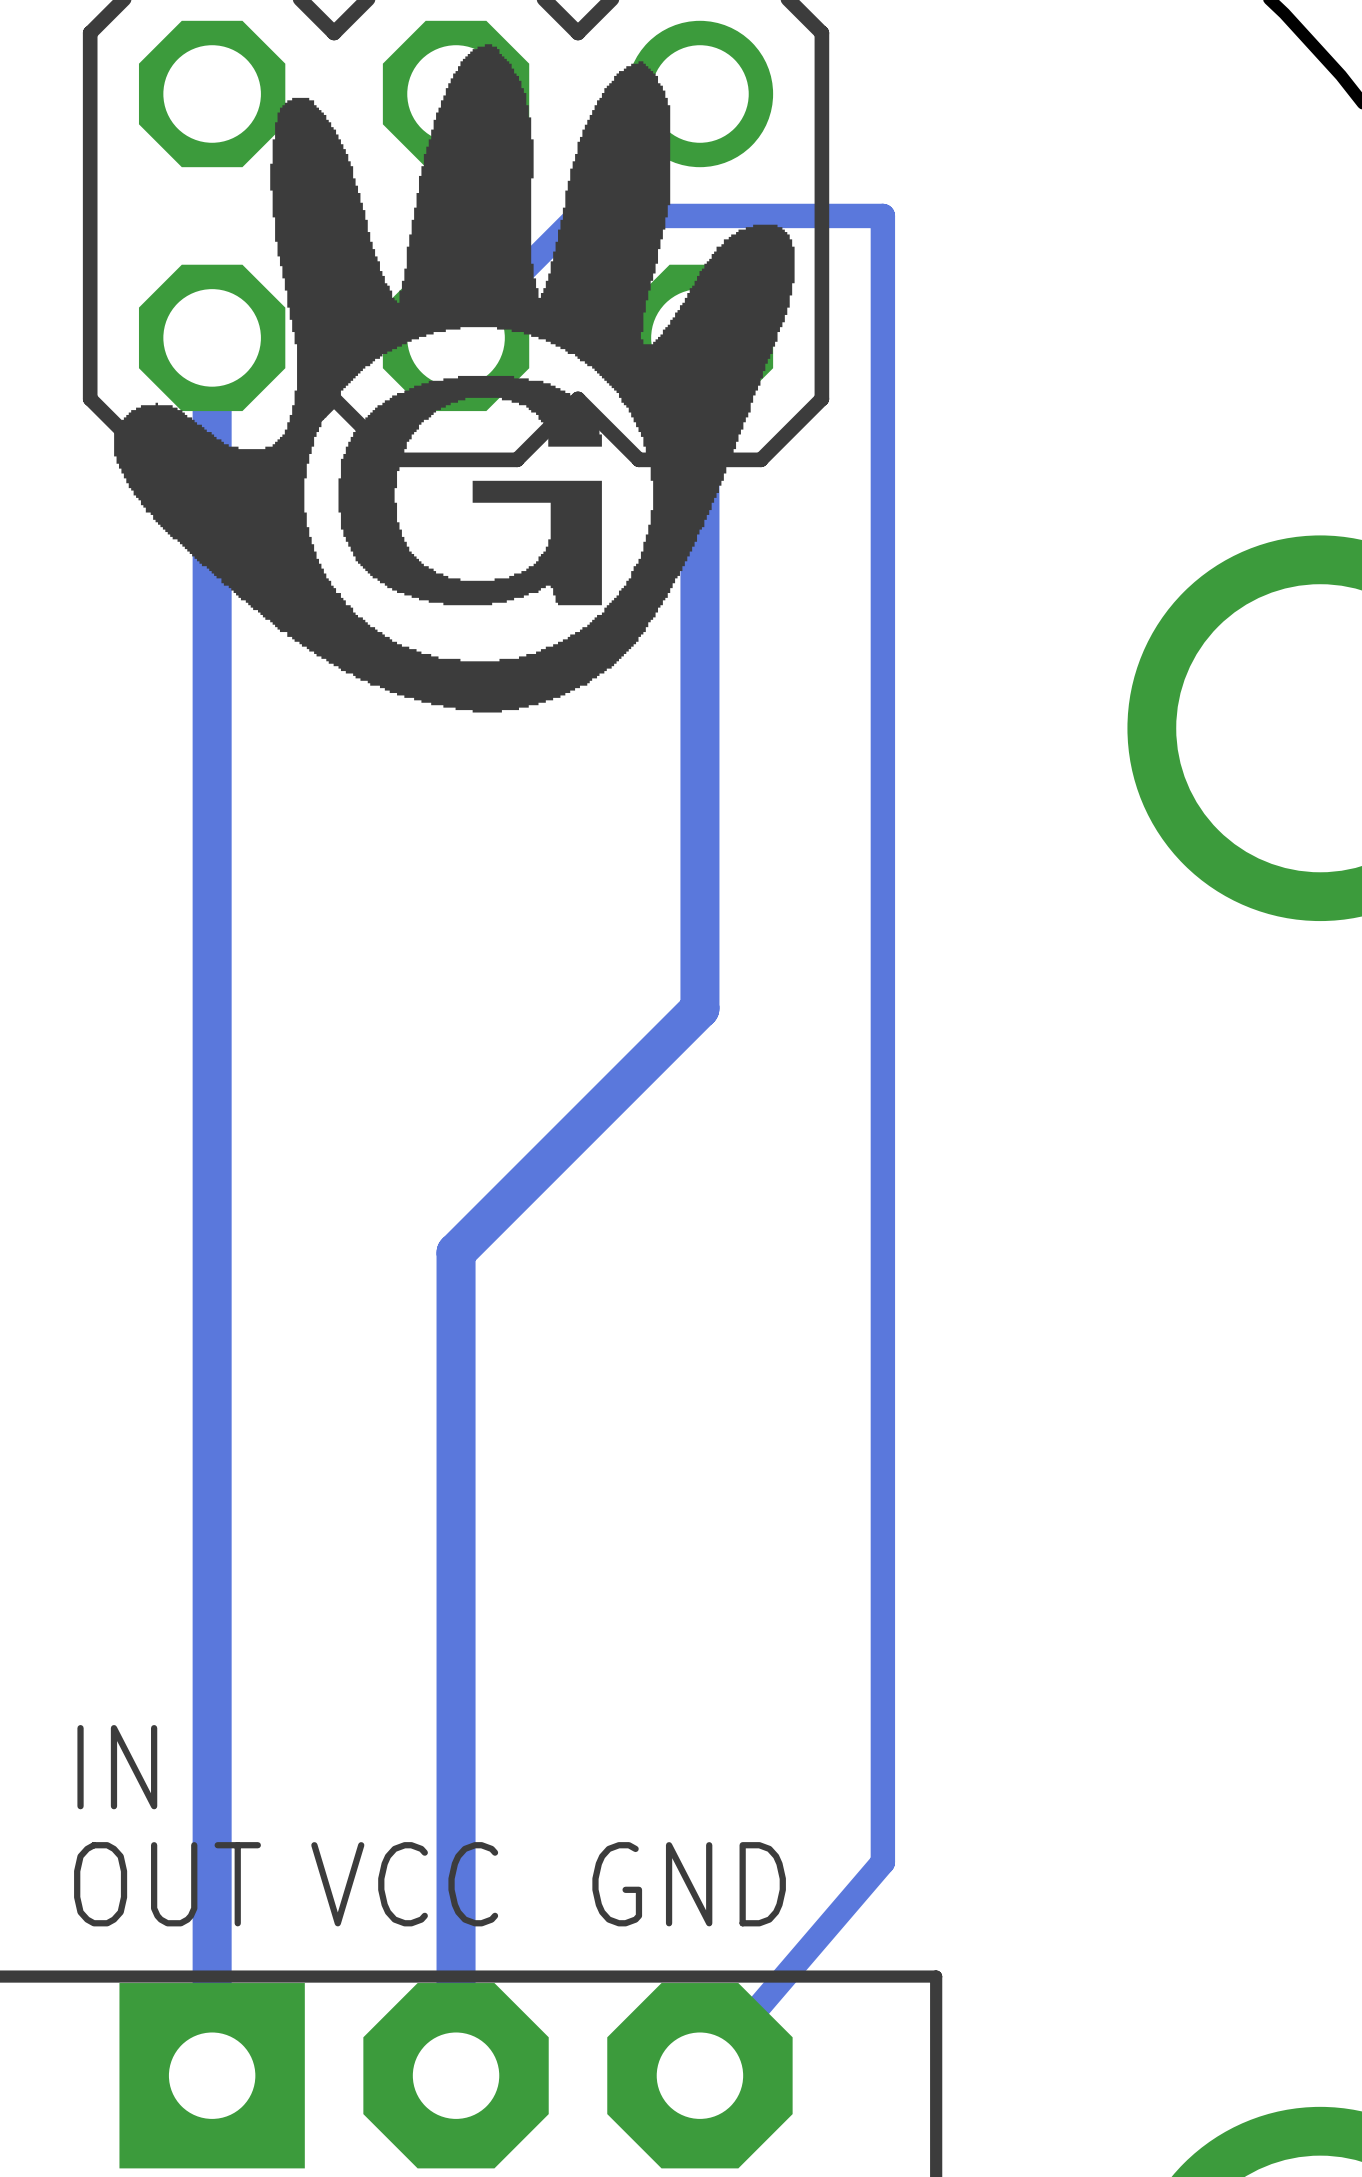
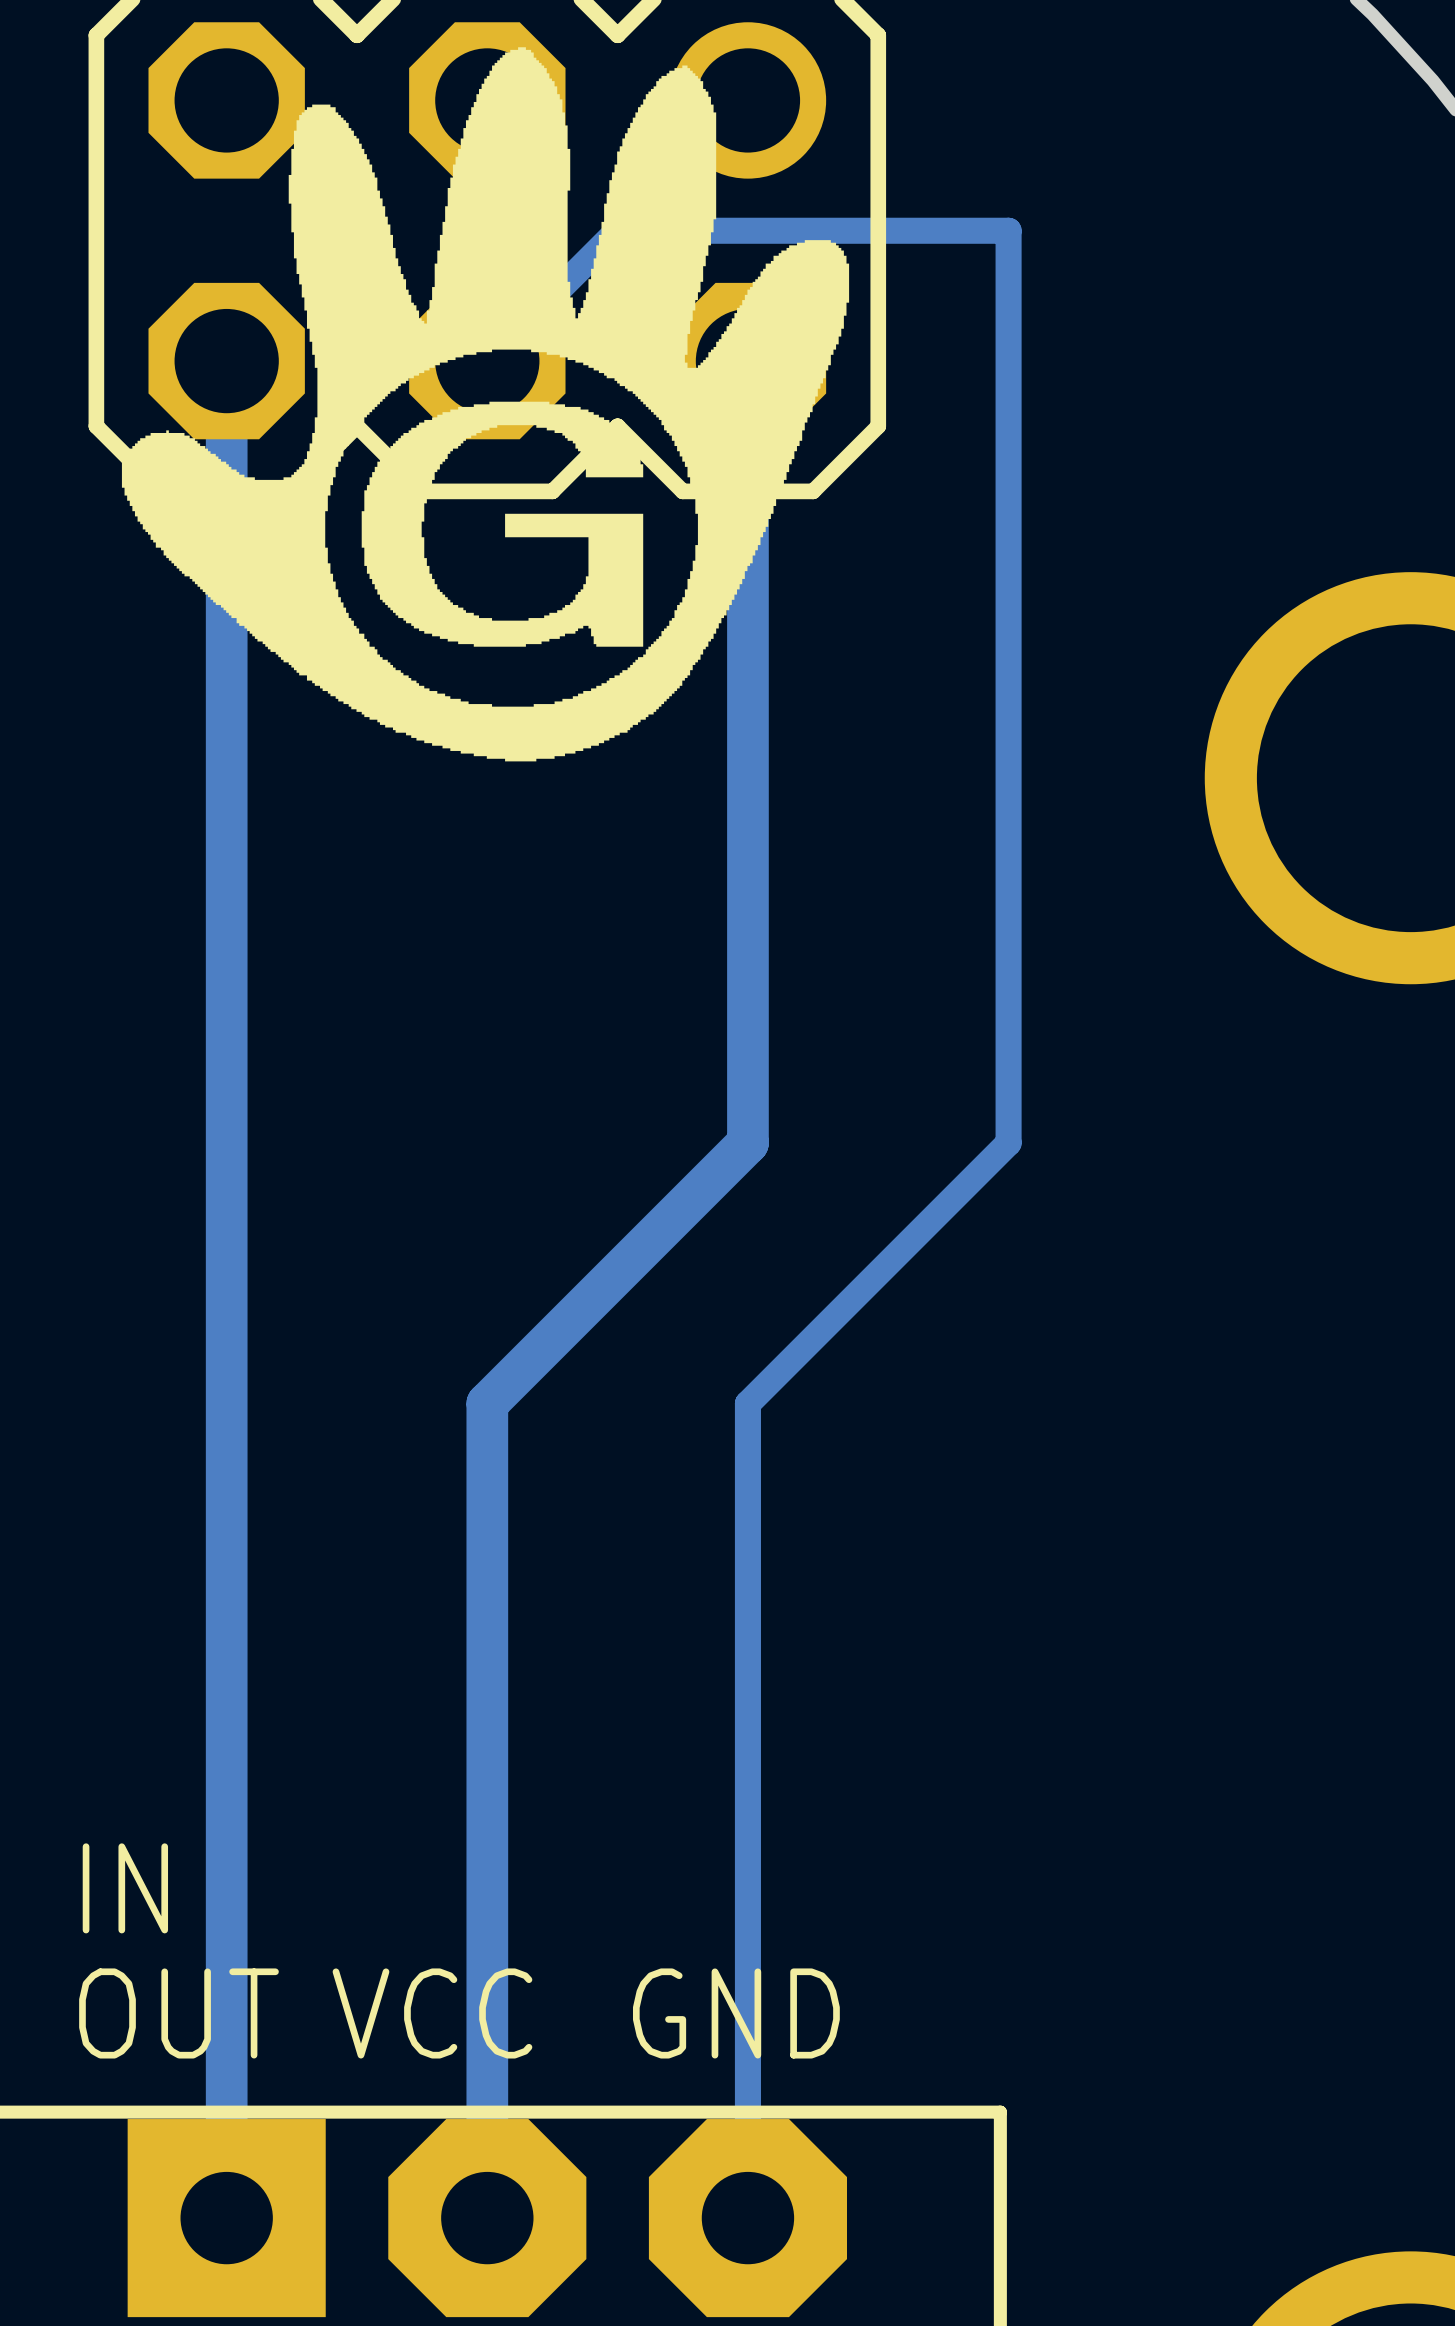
bottom track: (882, 215) (882, 1862) (699, 2075) -> (943, 230) (1008, 230) (1008, 1142) (747, 1403) (747, 2218)
bottom track: (699, 1008) (456, 1252) (456, 2075) -> (747, 1077) (747, 1142) (487, 1403) (487, 2218)

